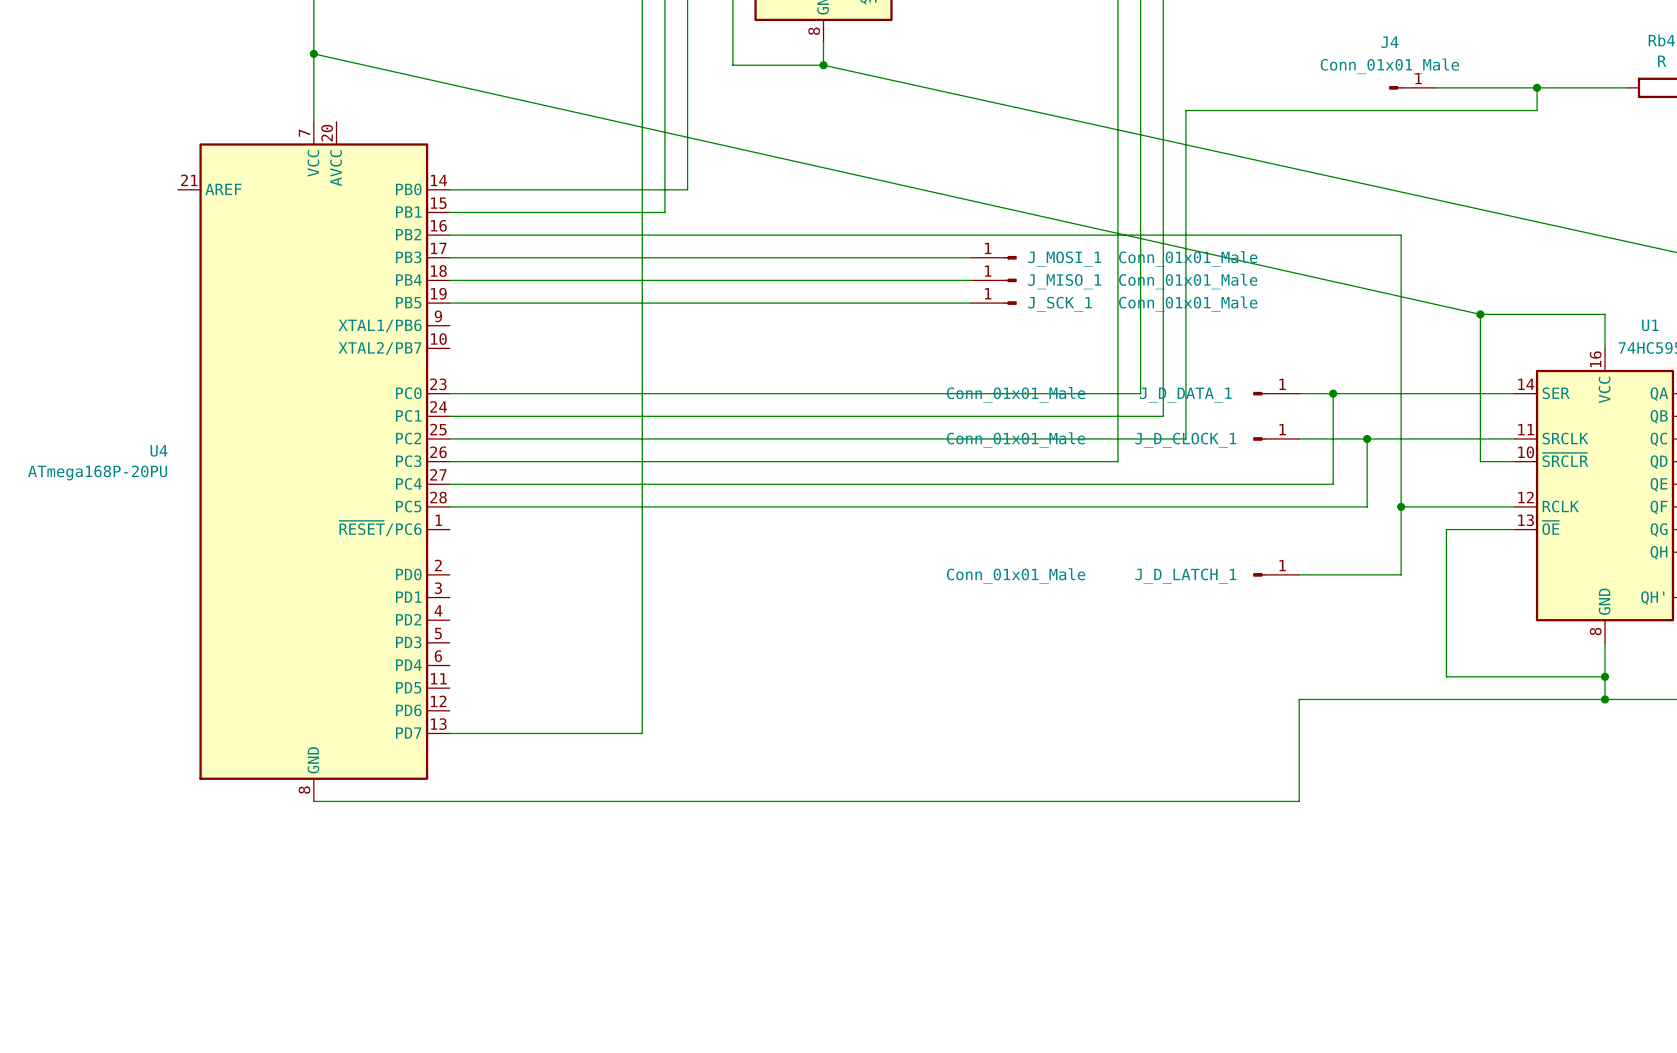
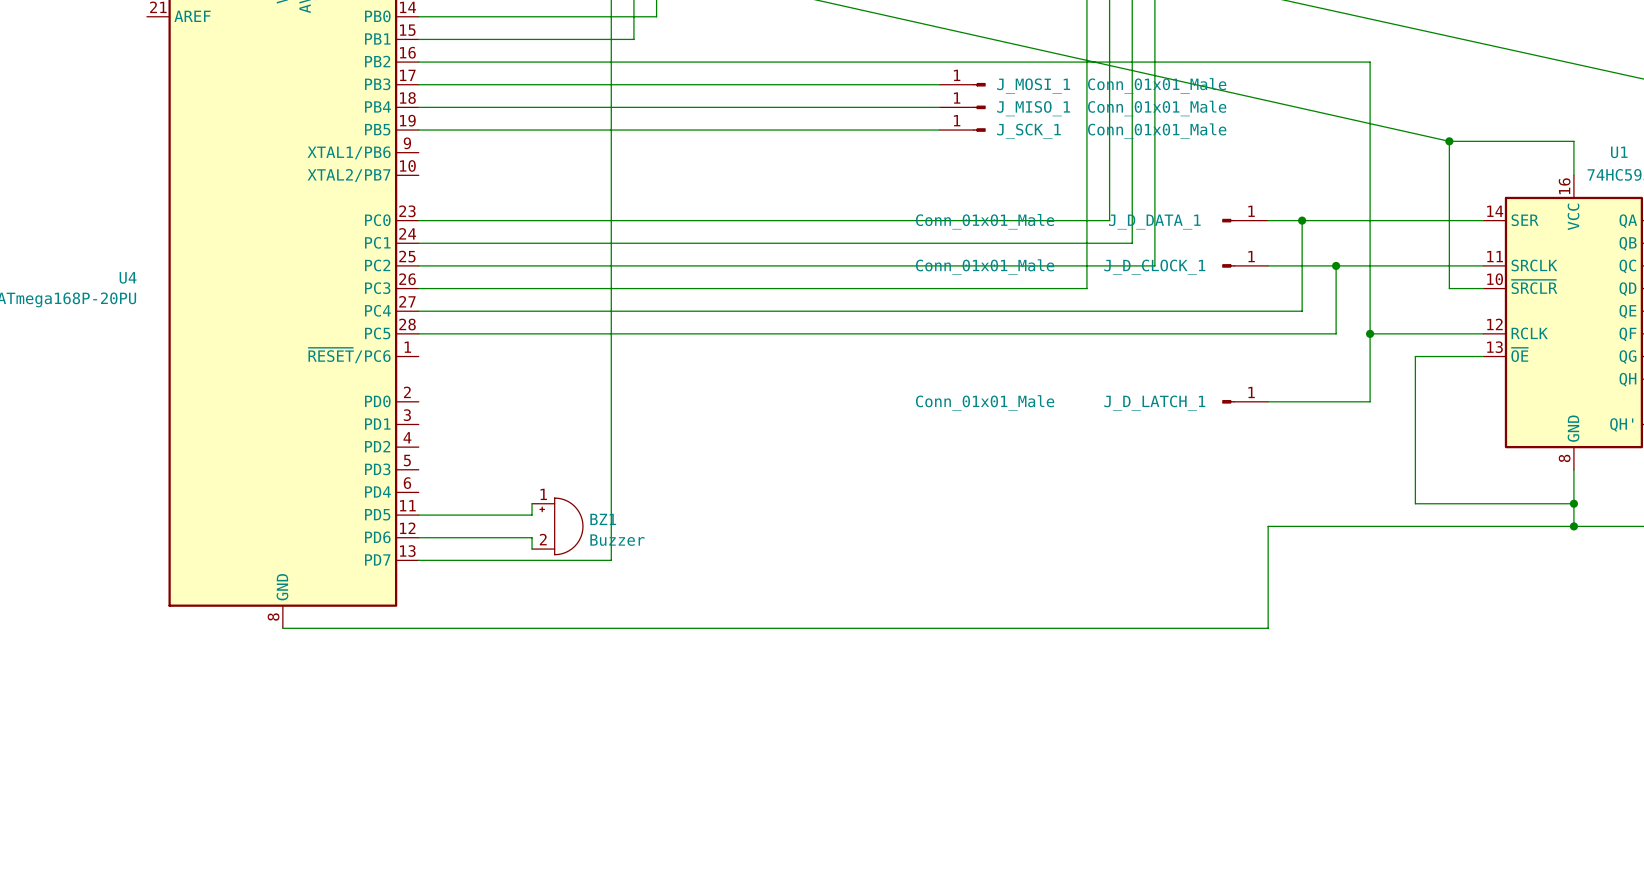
wire: none -> (532, 503) (532, 515) (418, 515)
BZ1: none -> Buzzer (557, 526)
wire: none -> (418, 537) (532, 537) (532, 549)

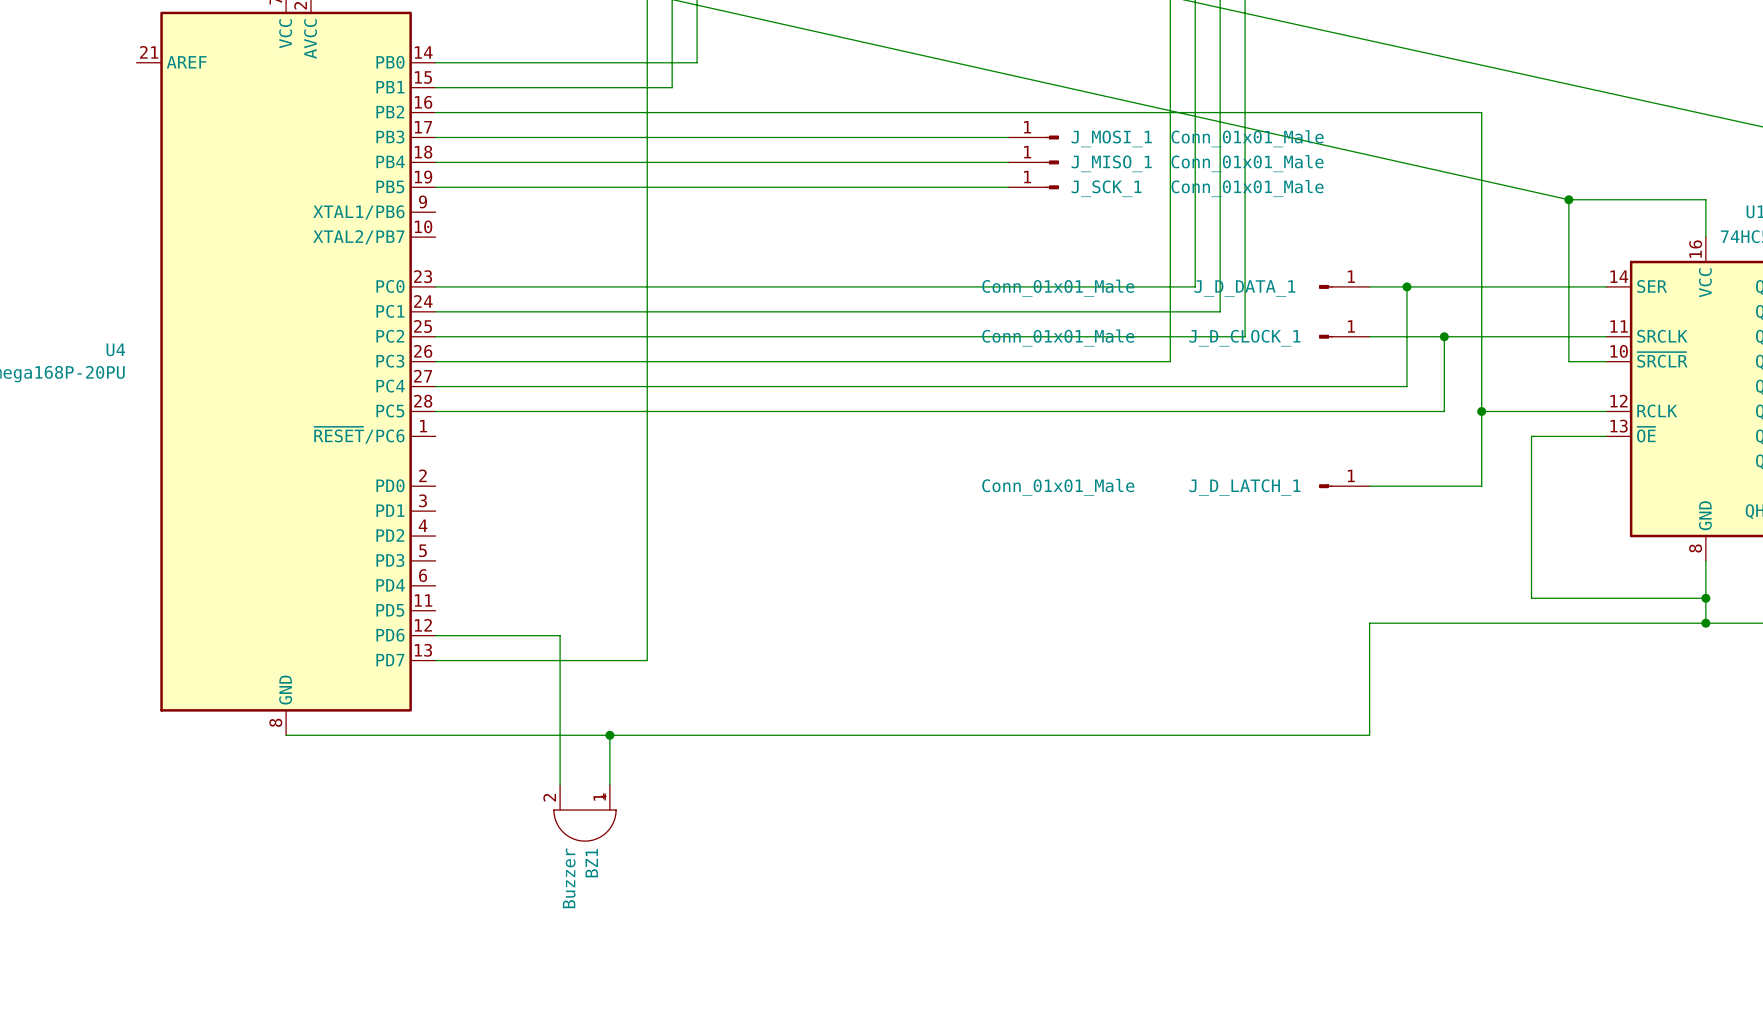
wire: (532, 503) (532, 515) (418, 515) -> none
BZ1 position: (557, 526) -> (584, 813)
BZ1 rotation: 0° (561, 526) -> 90° clockwise (584, 817)
wire: none -> (560, 648) (560, 785)
wire: none -> (609, 735) (609, 785)
junction: none -> (609, 735)

